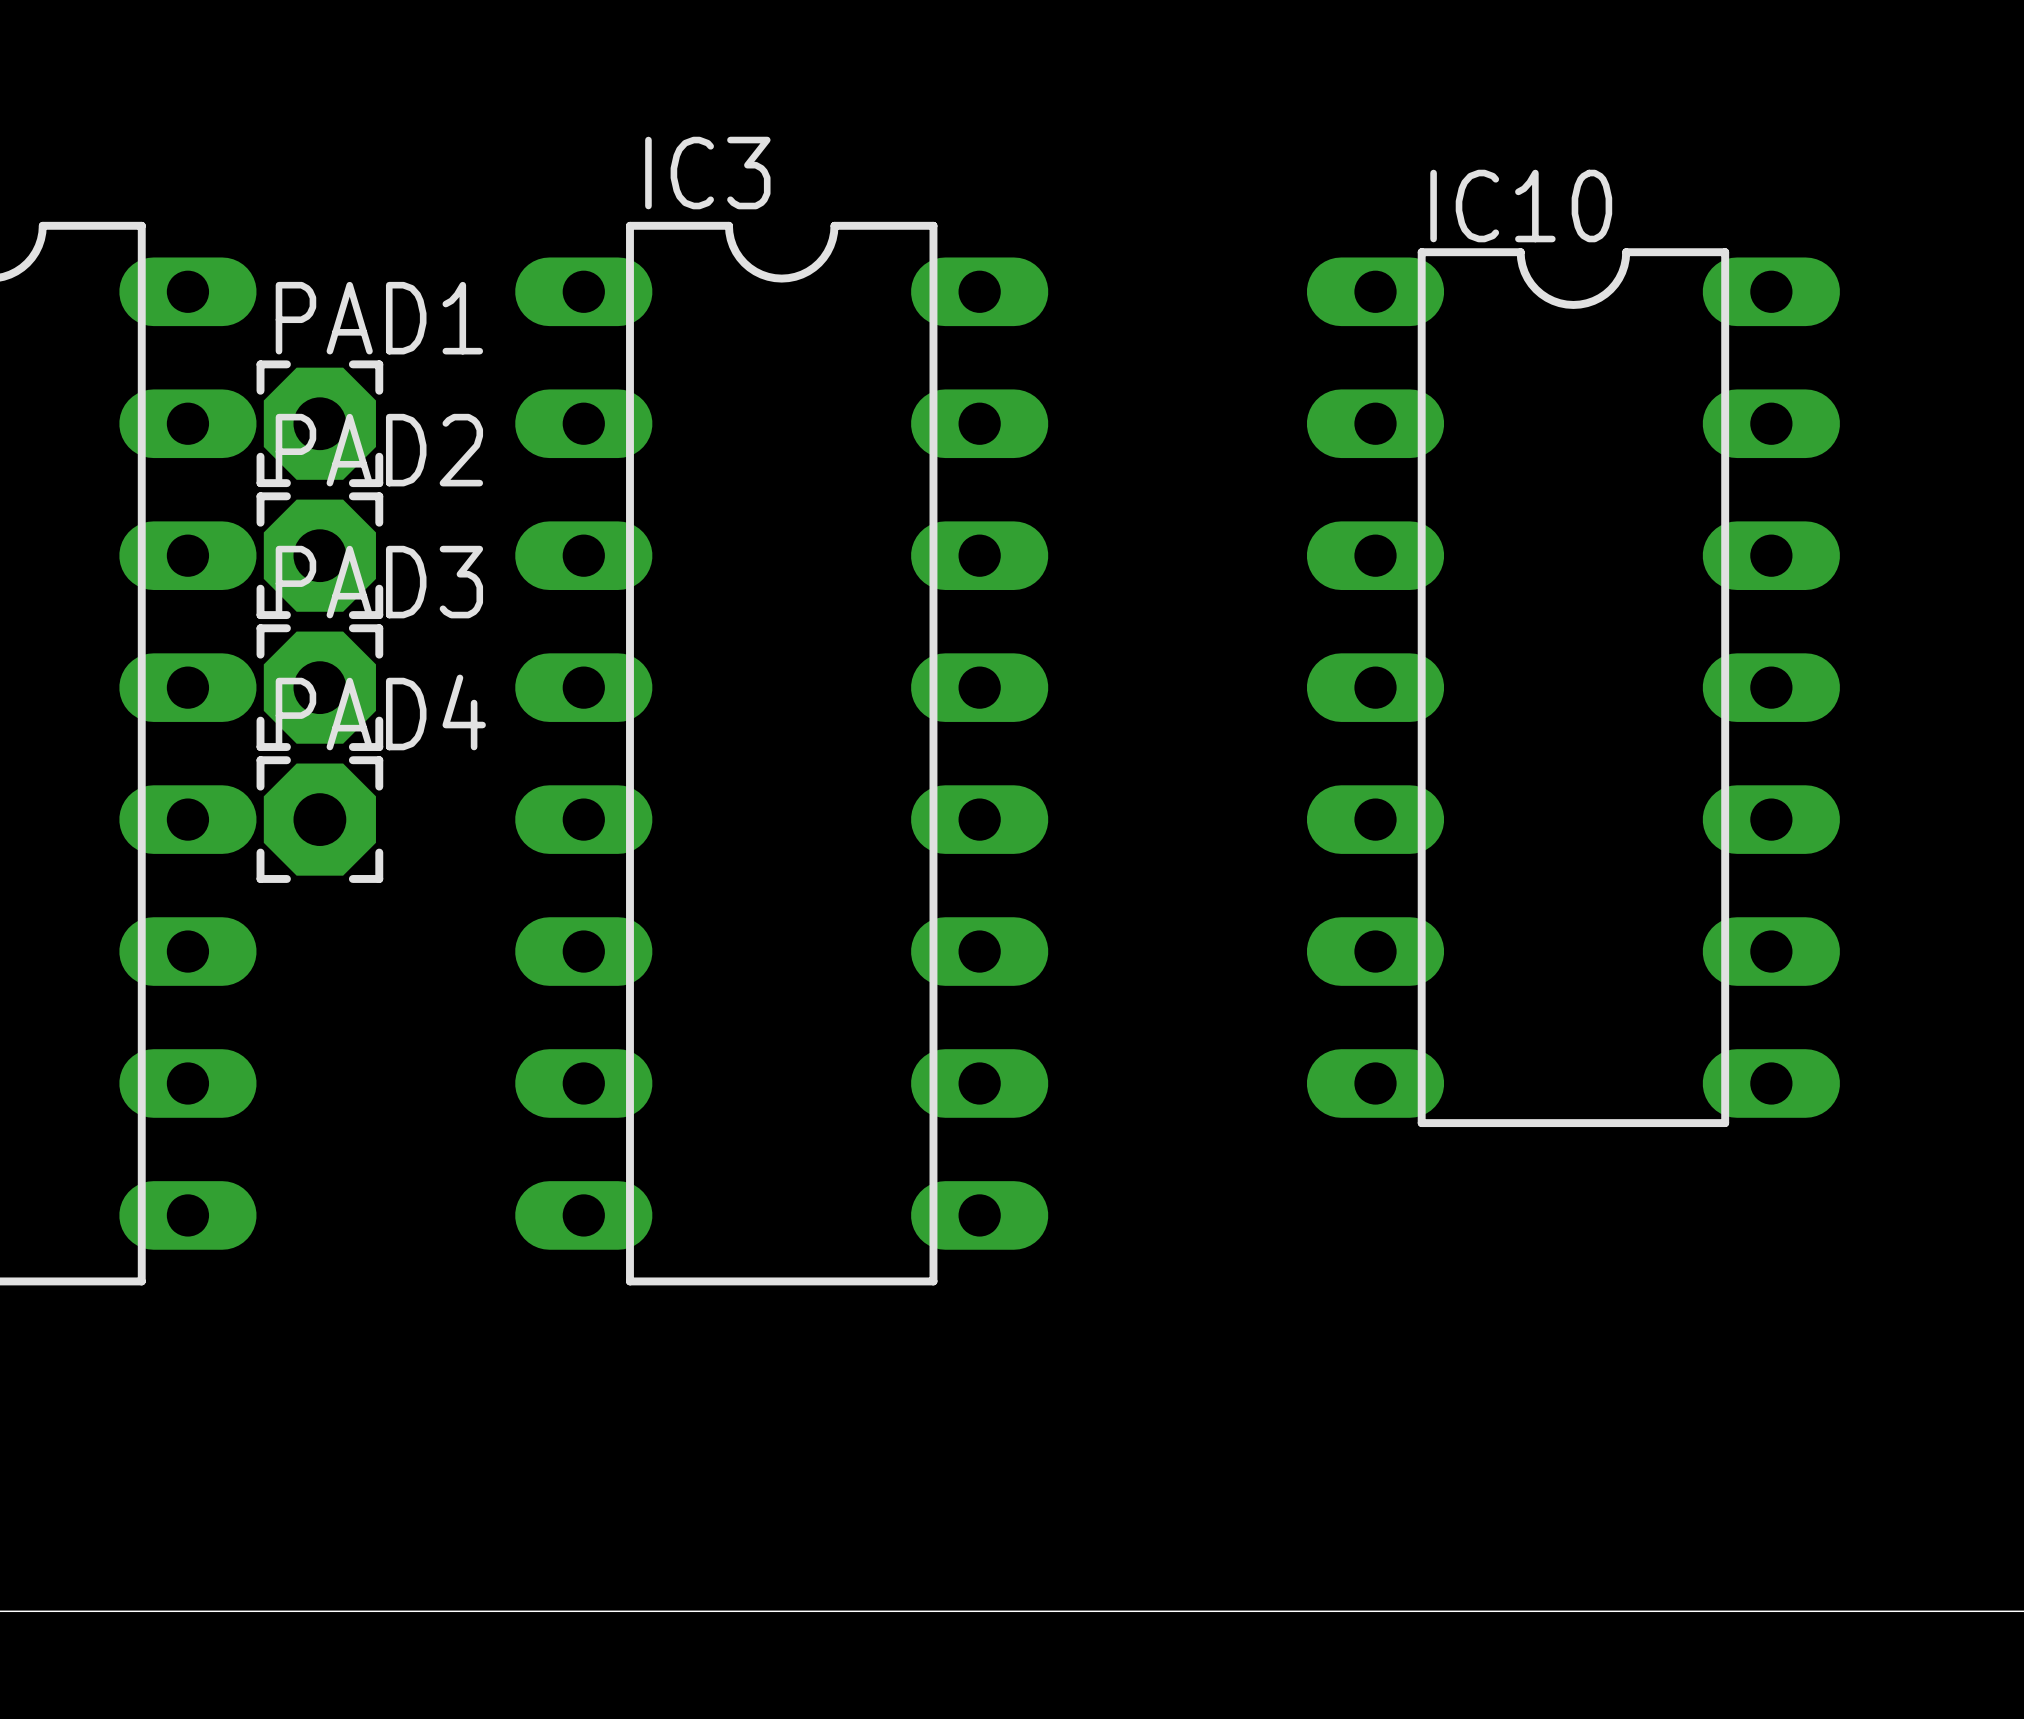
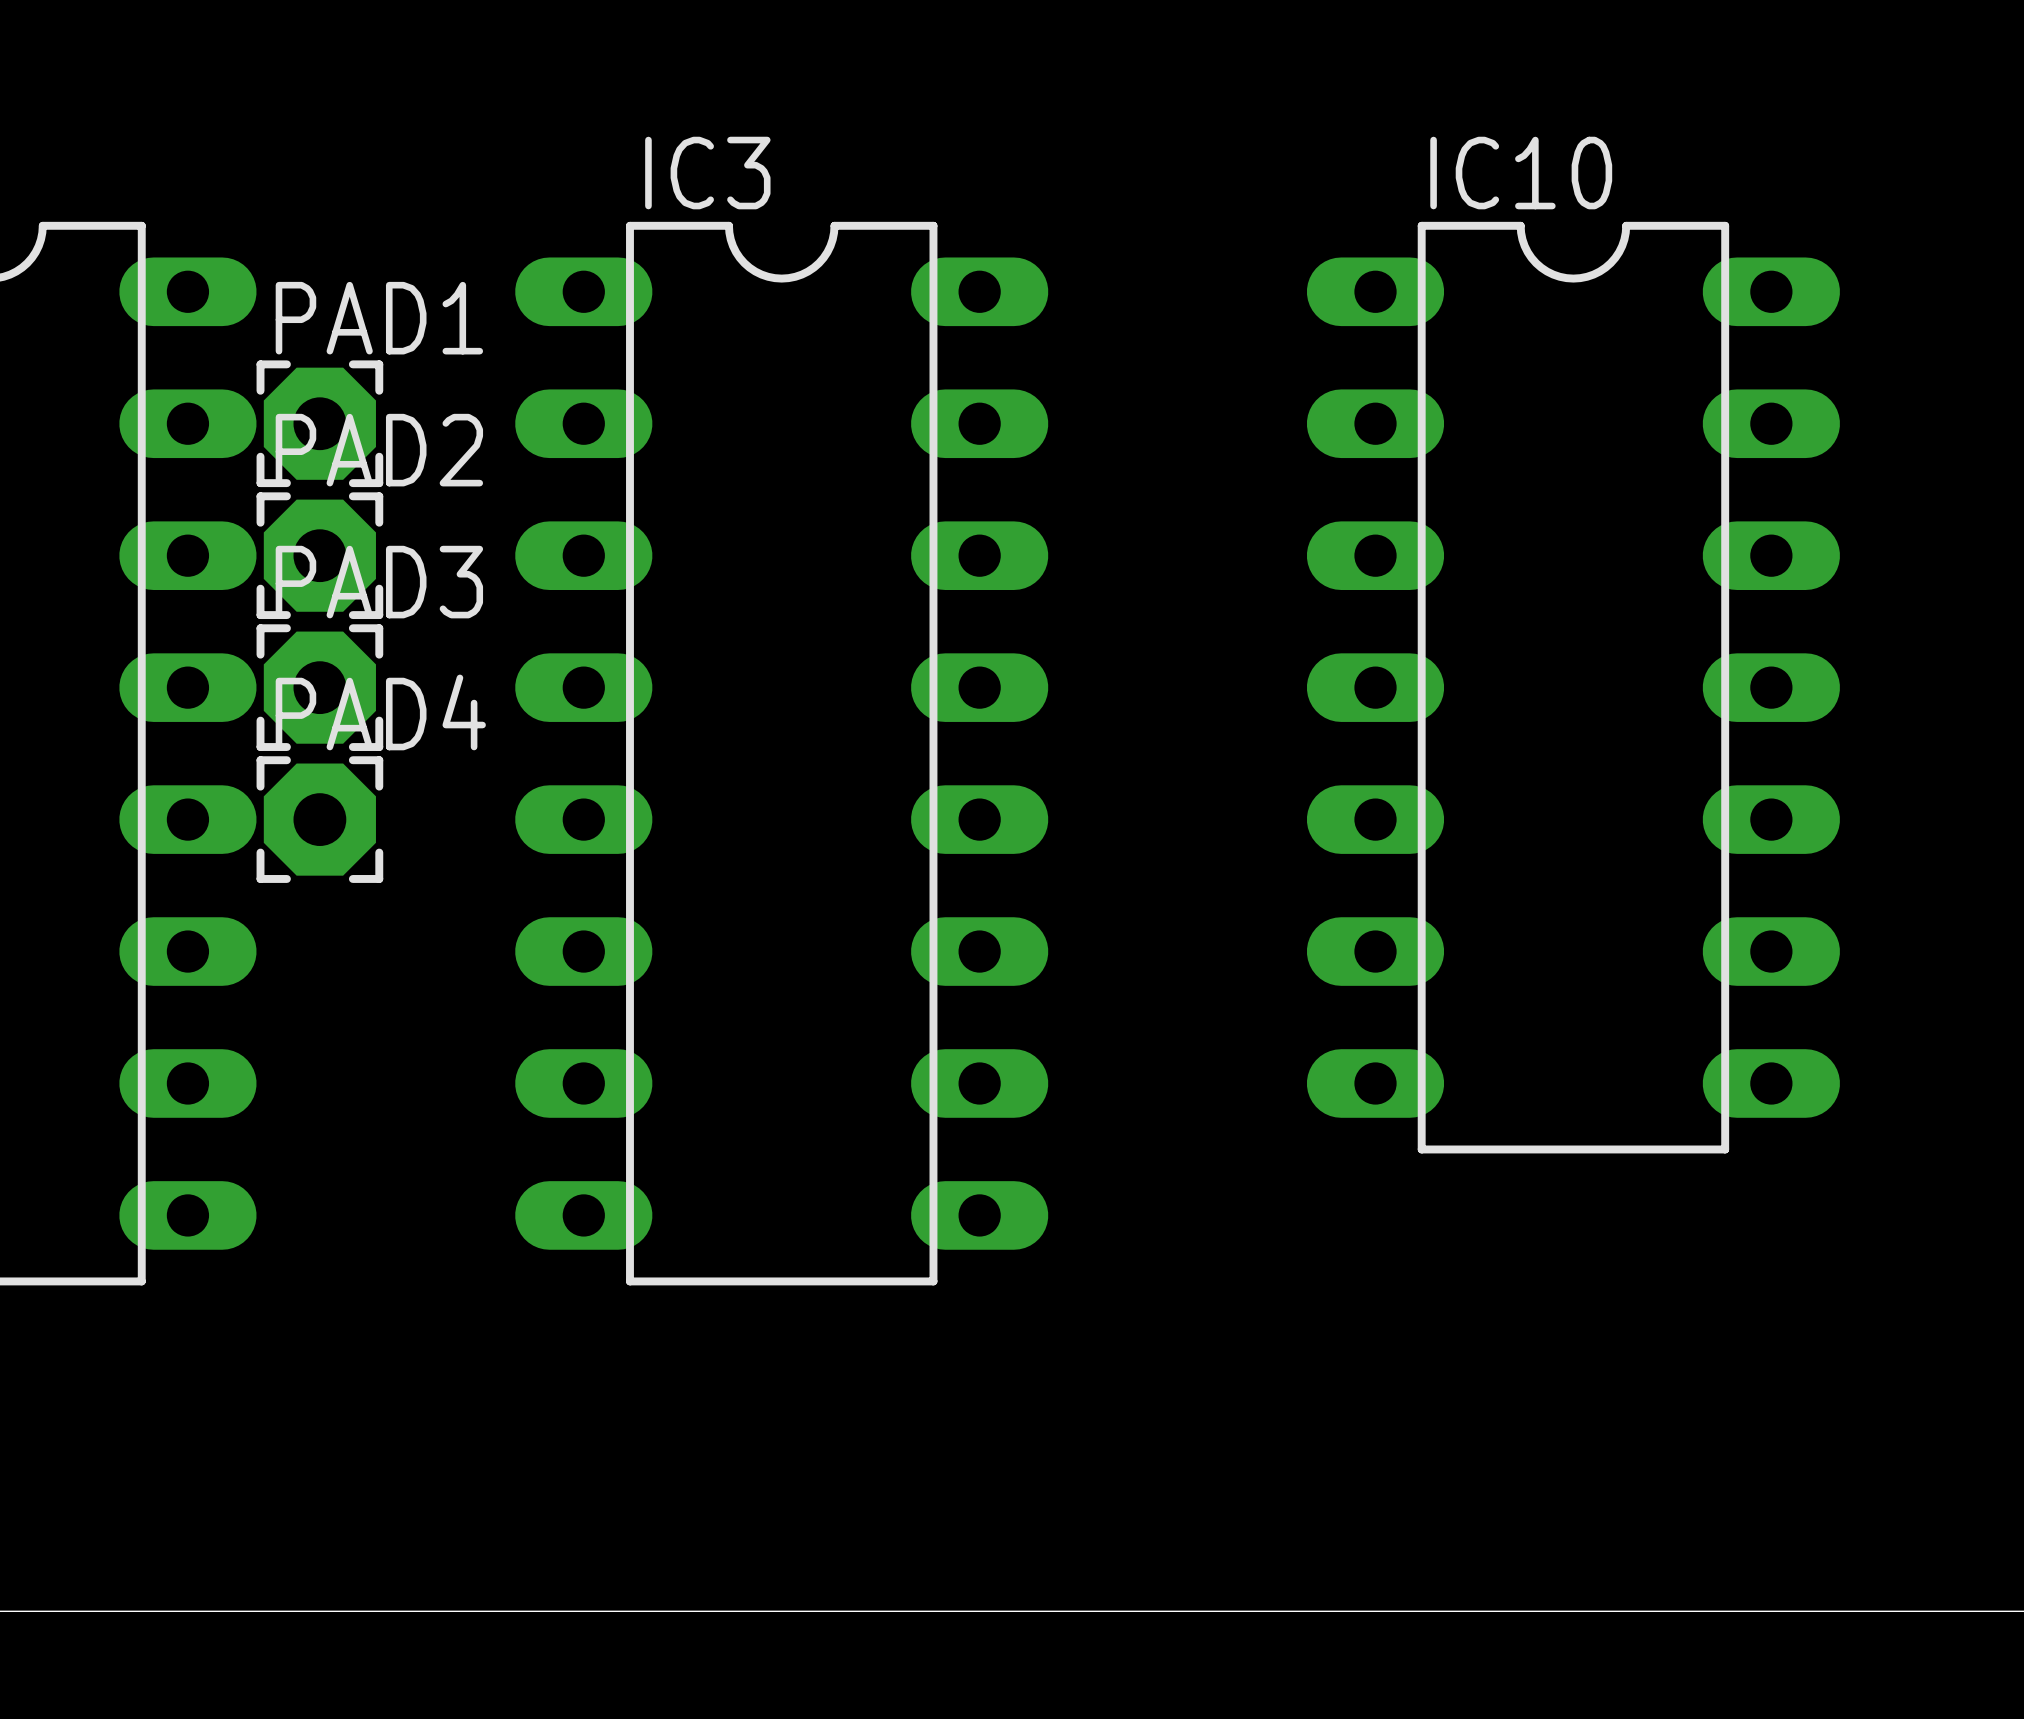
IC10 name position: IC10 (1521, 206) -> IC10 (1521, 173)
IC10 footprint: [1306, 248, 1840, 1128] -> [1306, 221, 1840, 1154]

